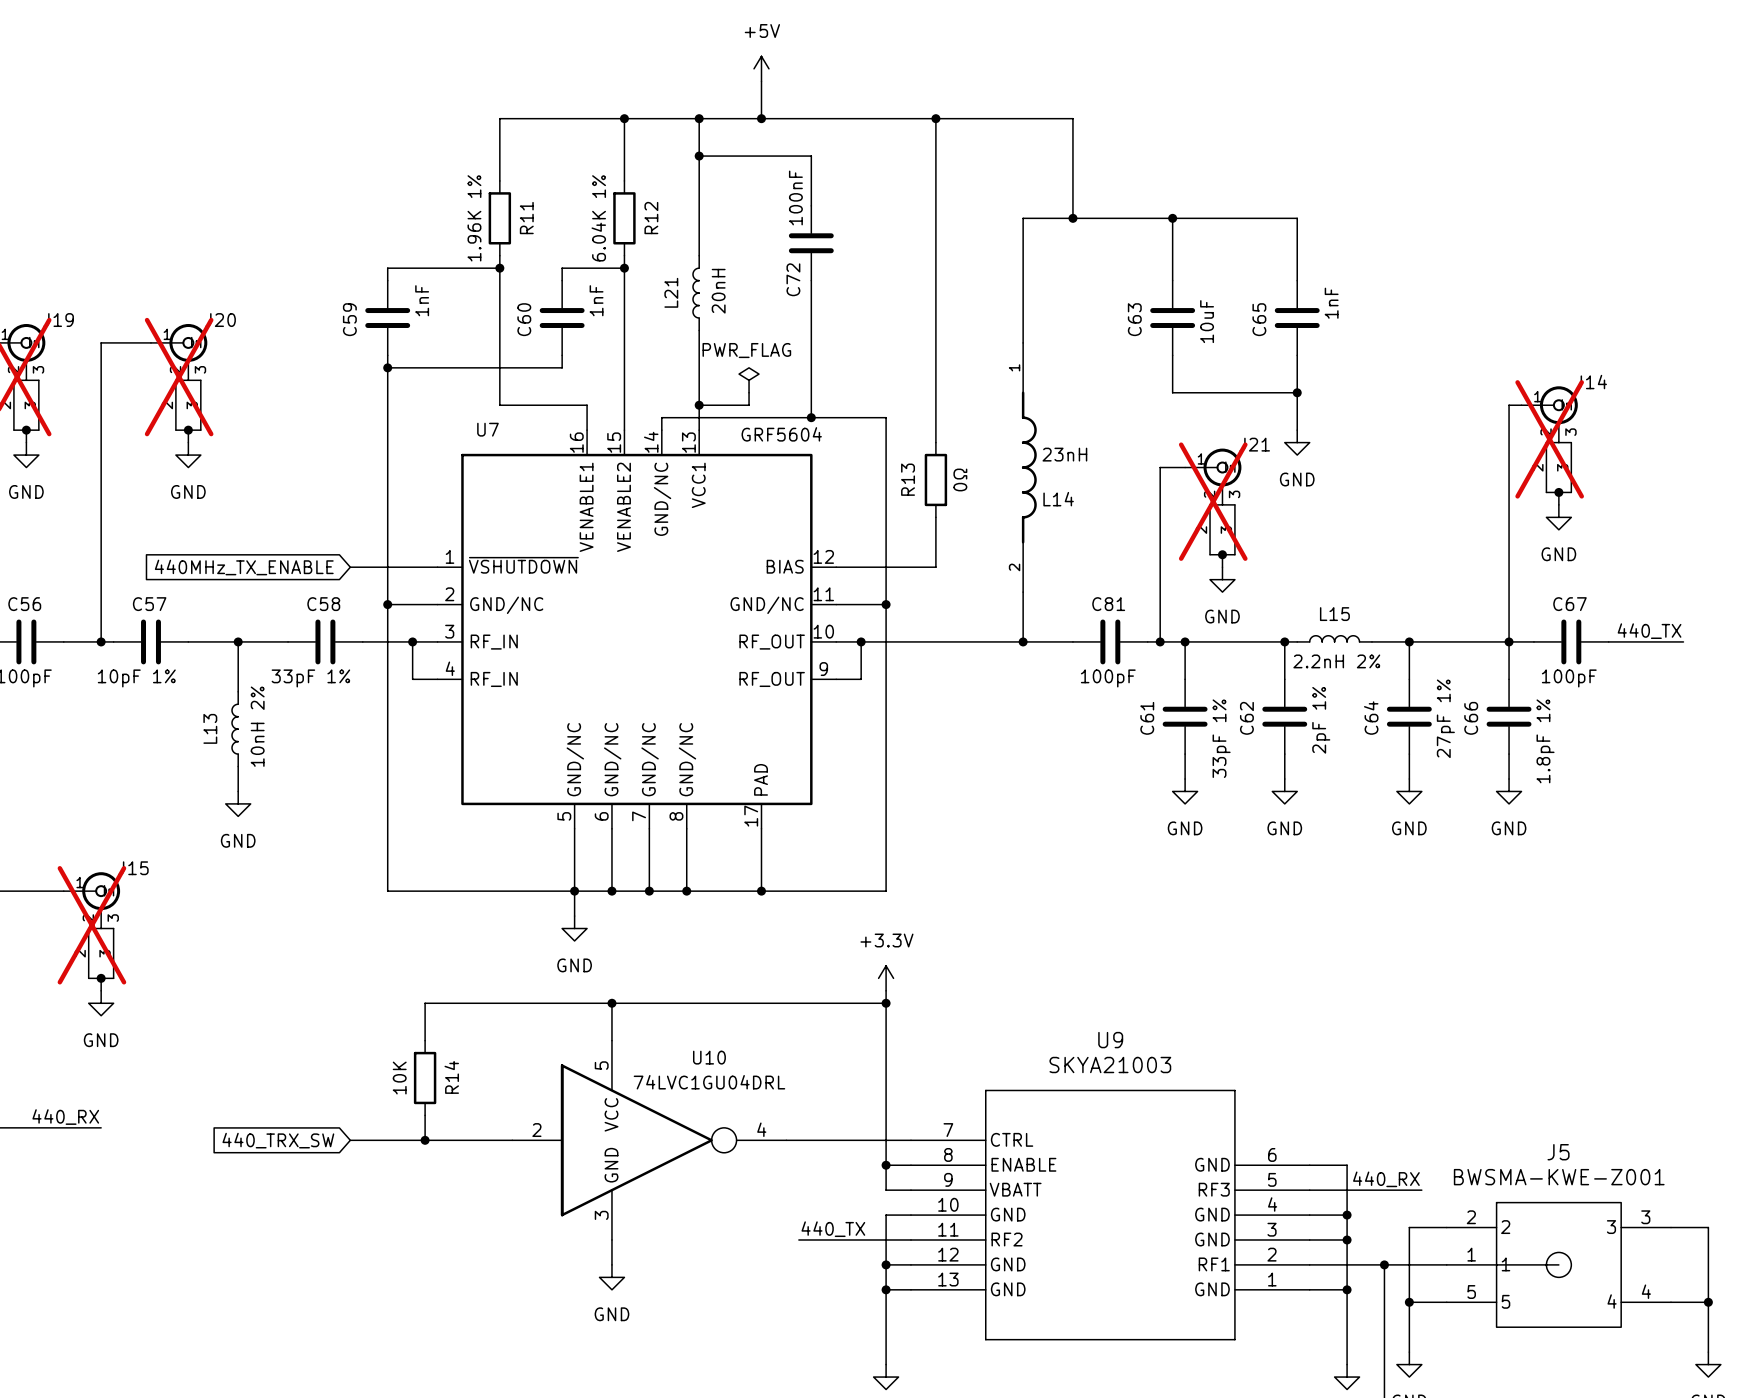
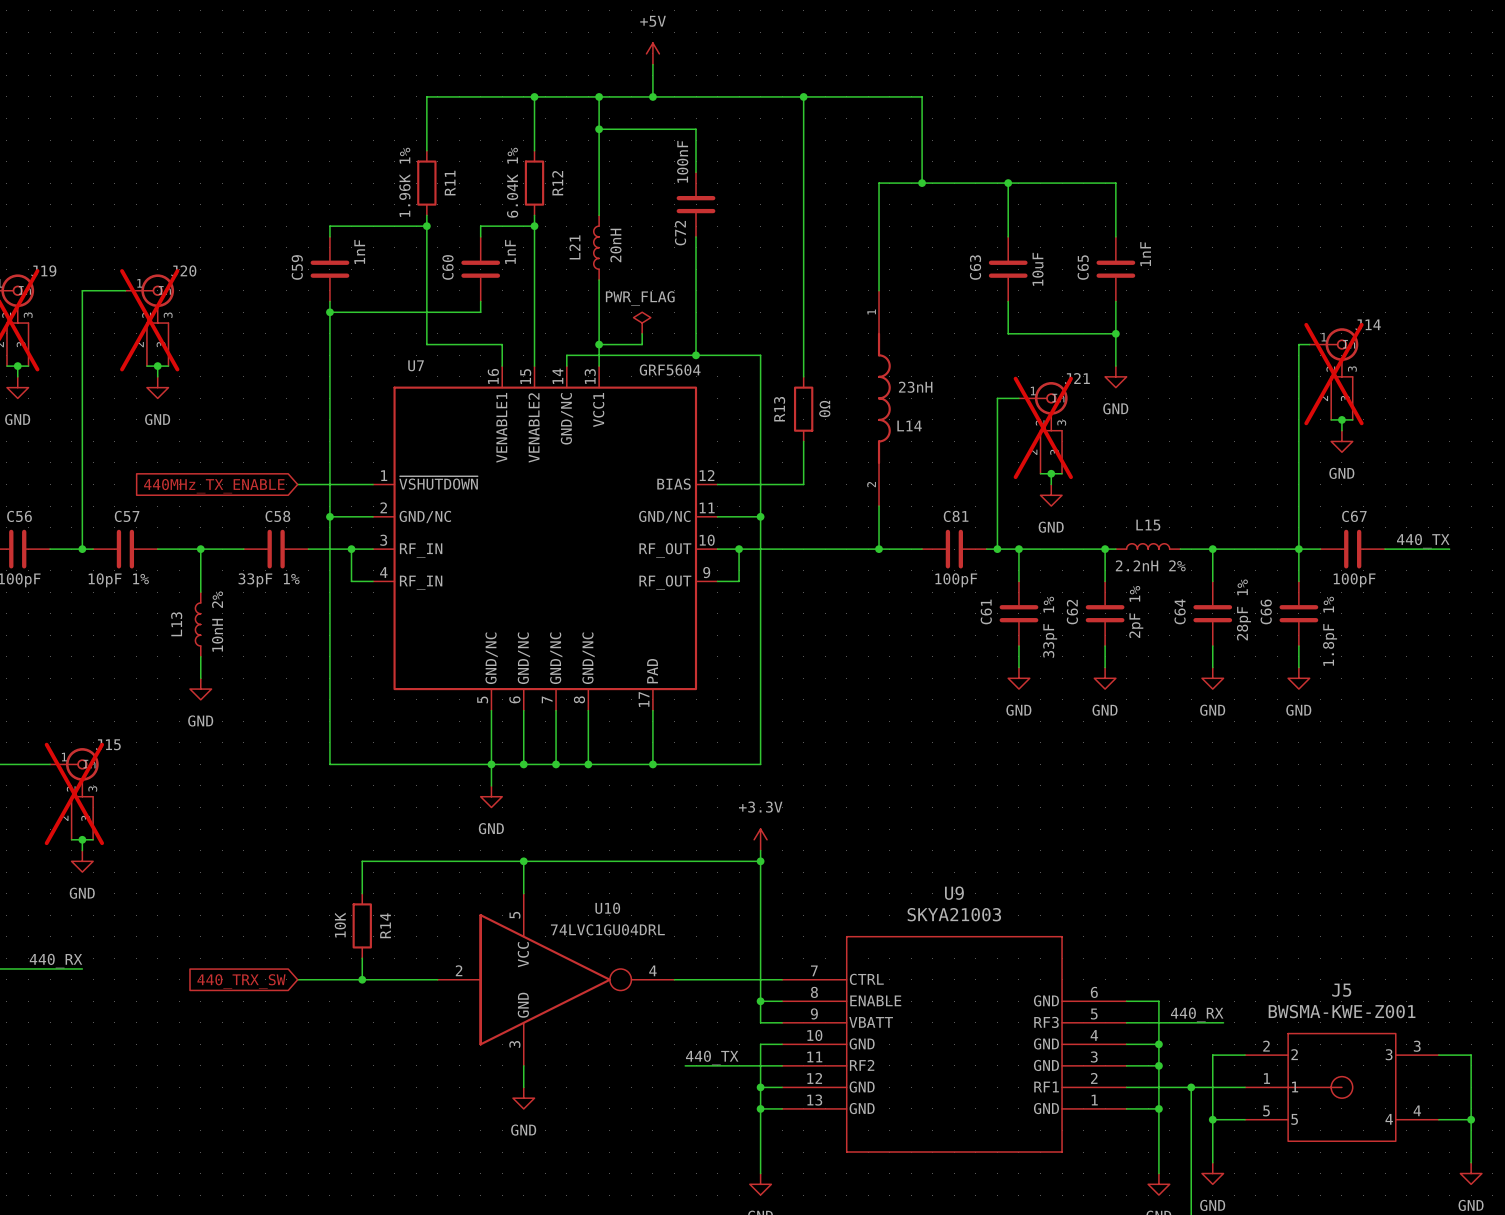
C64 value: 27pF 1% (1445, 718) -> 28pF 1% (1243, 609)

